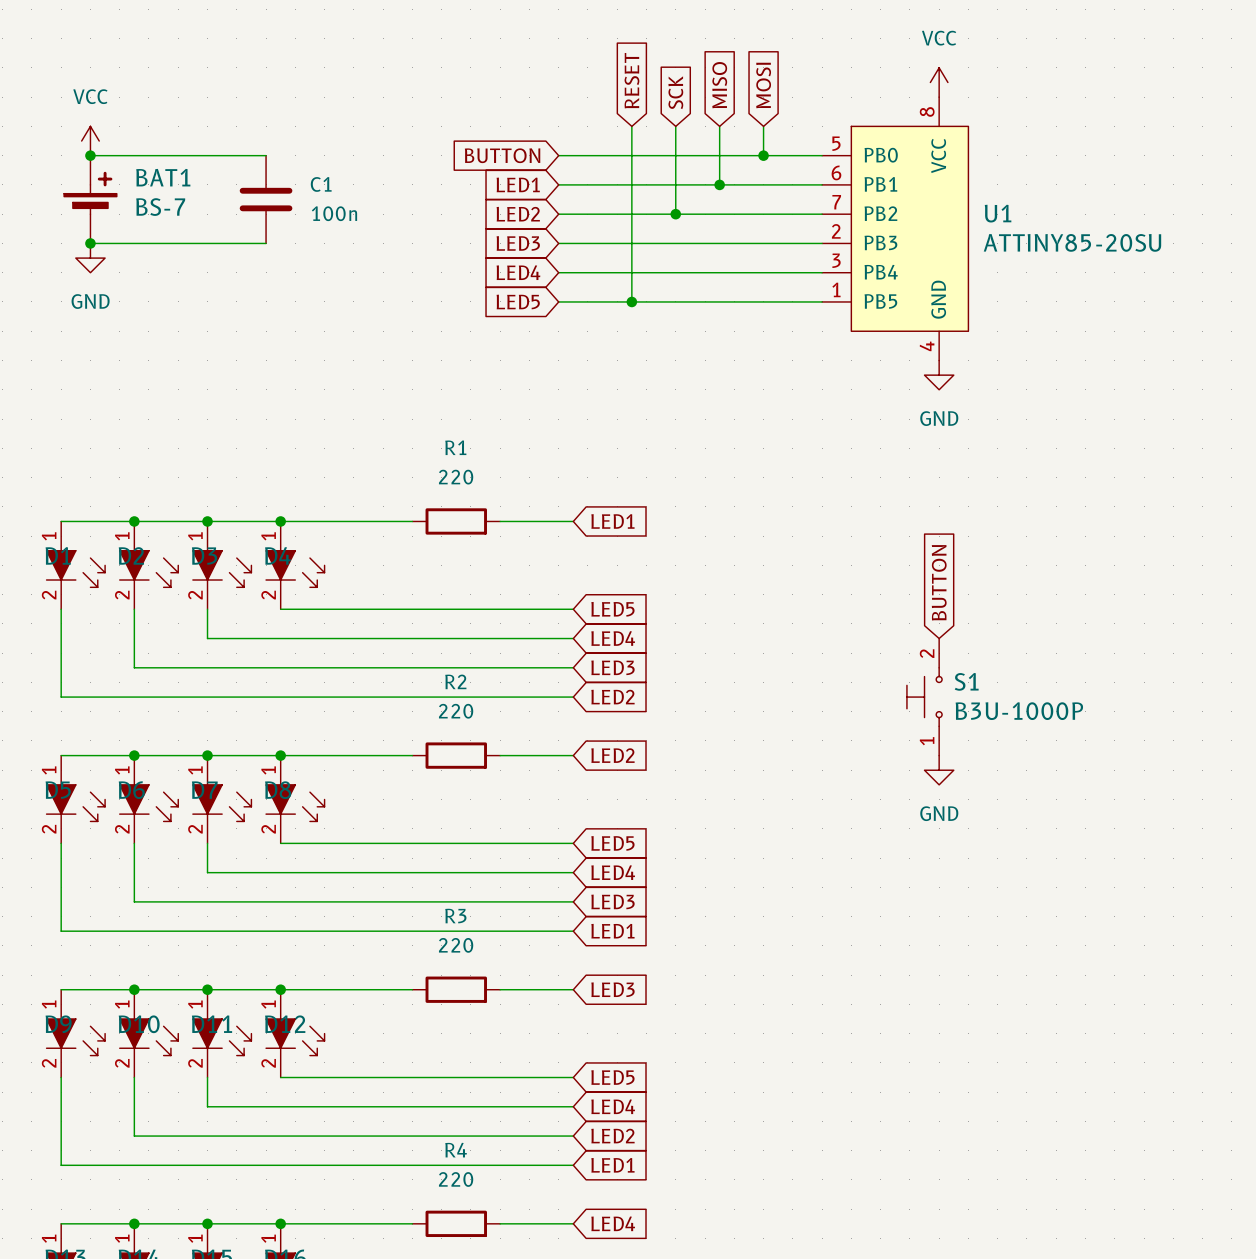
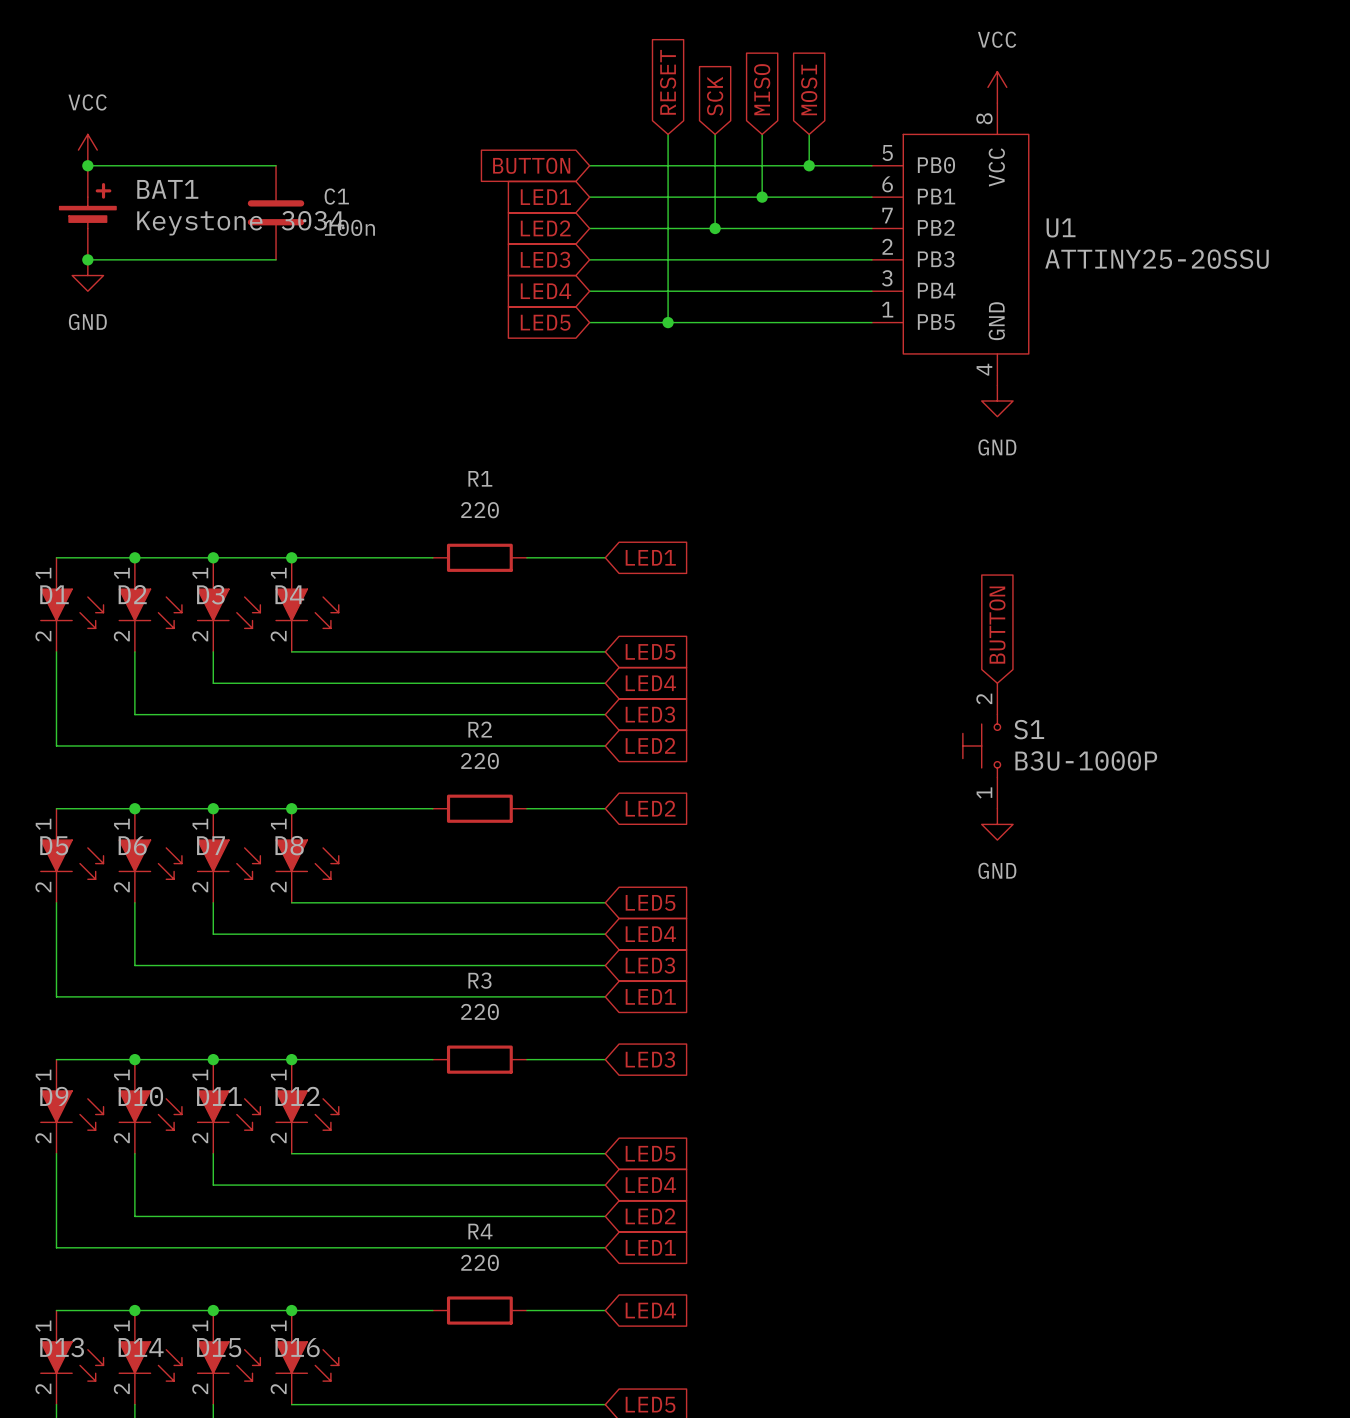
BAT1 value: BS-7 (160, 207) -> Keystone 3034 (240, 223)
U1 value: ATTINY85-20SU (1072, 242) -> ATTINY25-20SSU (1157, 259)

